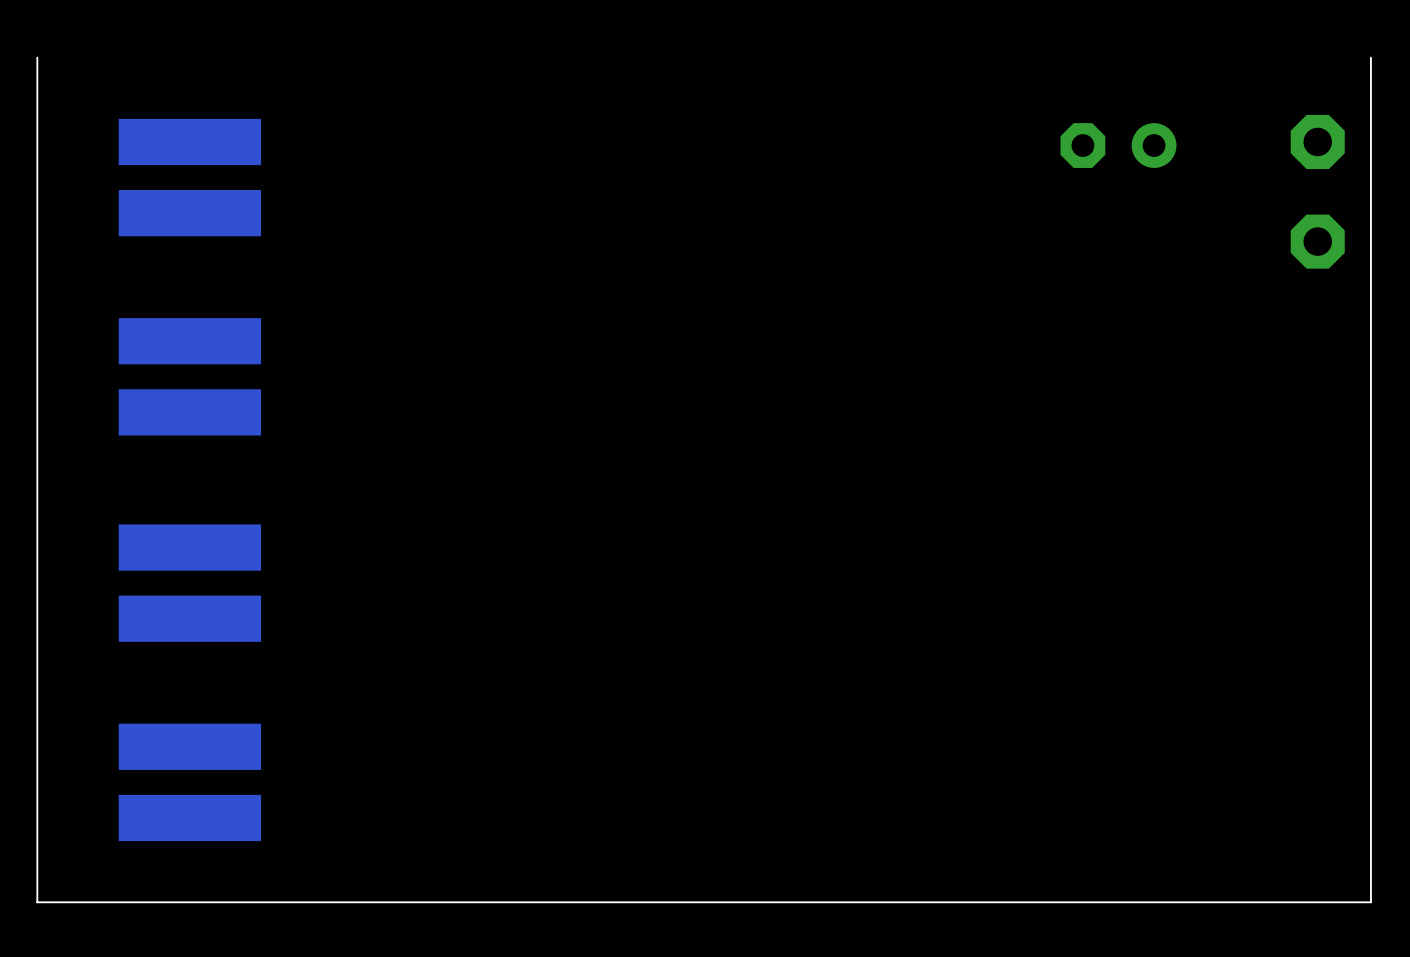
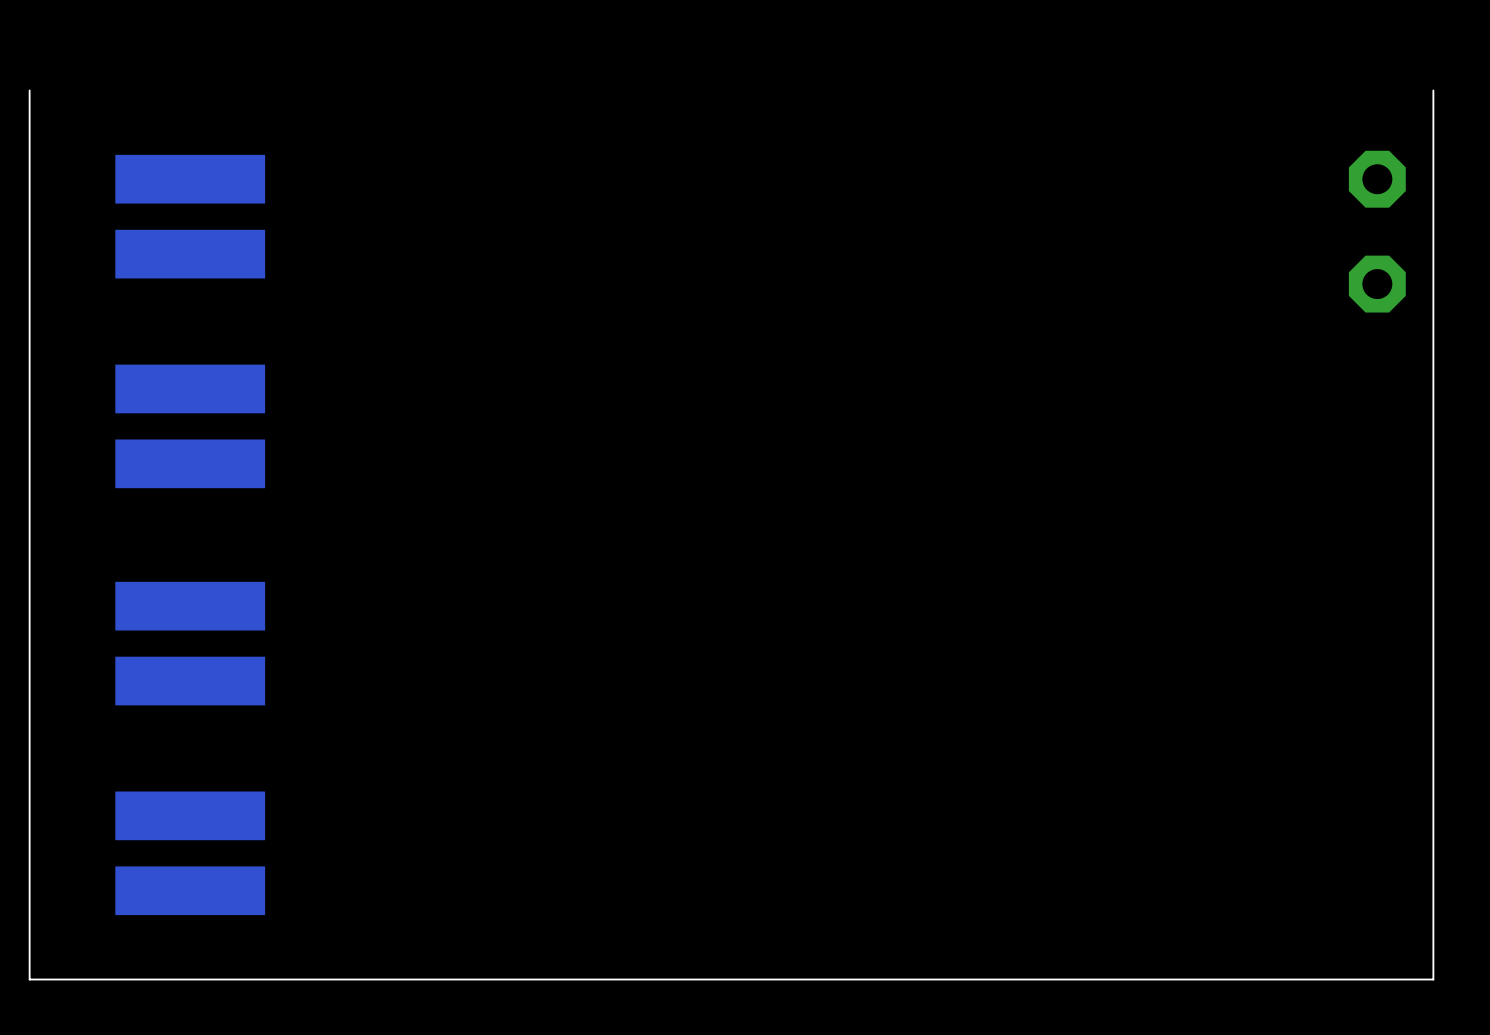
part: (1118, 145) -> none

